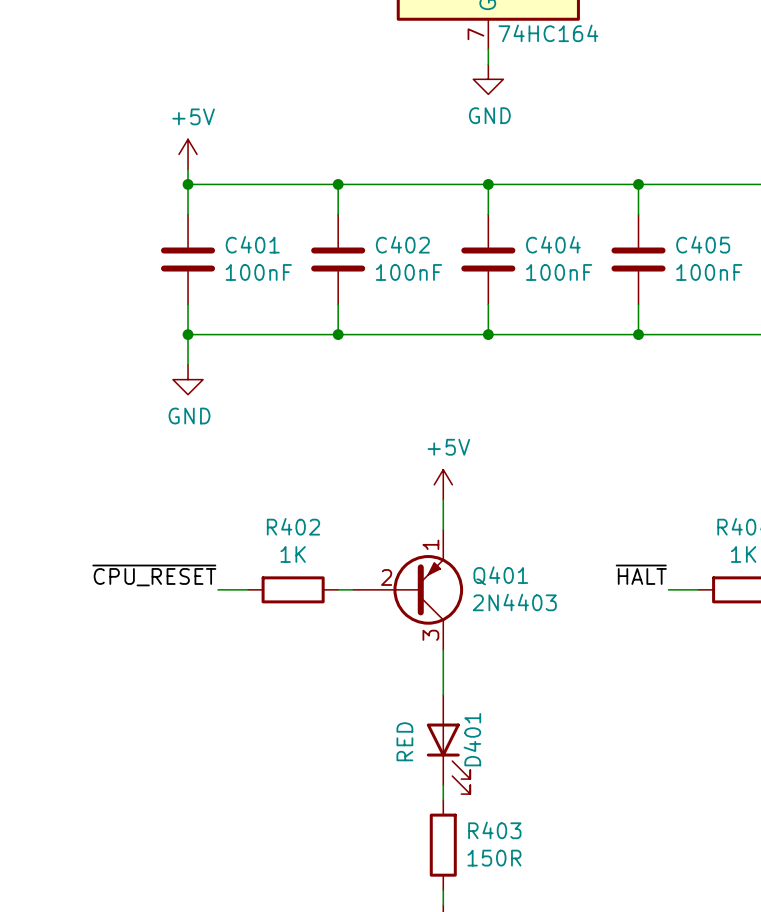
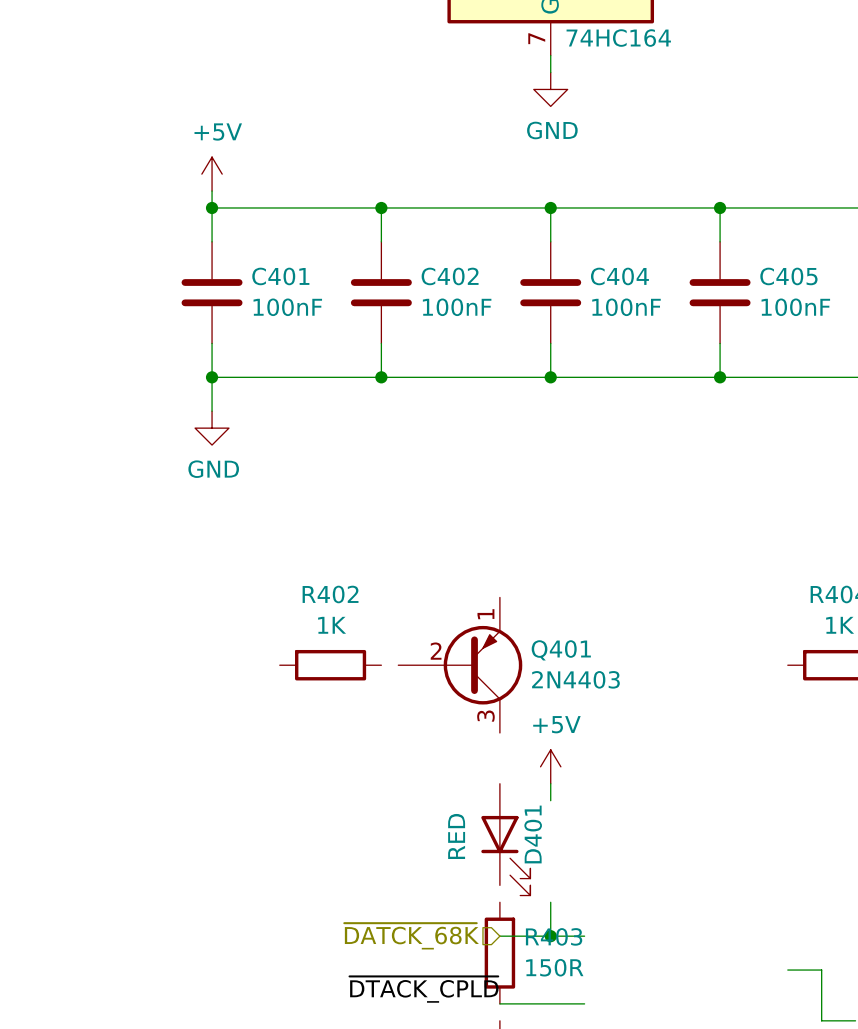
power symbol position: +5V (443, 484) -> +5V (550, 766)
wire: (443, 499) (443, 529) -> none
label: ~{HALT} (641, 574) -> none
label: ~{CPU_RESET} (154, 575) -> none
wire: (218, 589) (248, 589) -> none
wire: (338, 589) (353, 589) -> none
wire: (668, 589) (698, 589) -> none
wire: (443, 649) (443, 694) -> none
wire: (443, 785) (443, 800) -> (550, 783) (550, 800)
wire: none -> (550, 902) (550, 936)
hierarchical label: none -> ~{DATCK_68K} (411, 936)
wire: none -> (499, 936) (584, 936)
junction: none -> (550, 936)
wire: none -> (787, 970) (821, 970) (821, 1020) (855, 1020)
label: none -> ~{DTACK_CPLD} (424, 989)
wire: (443, 890) (443, 905) -> (499, 1003) (584, 1003)

